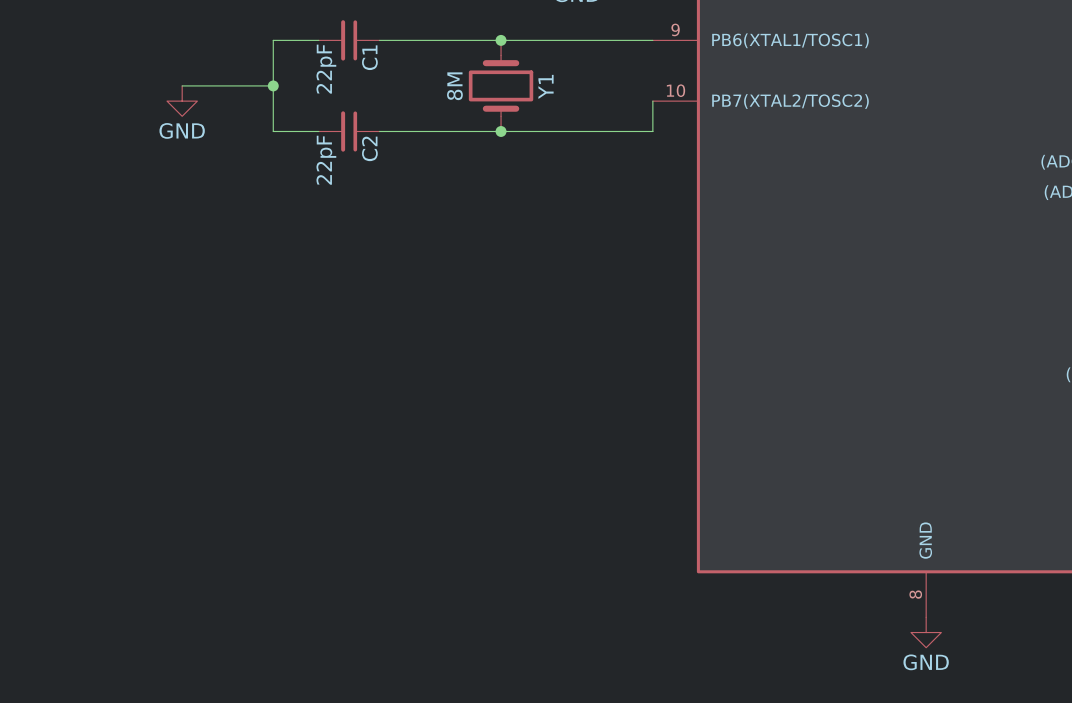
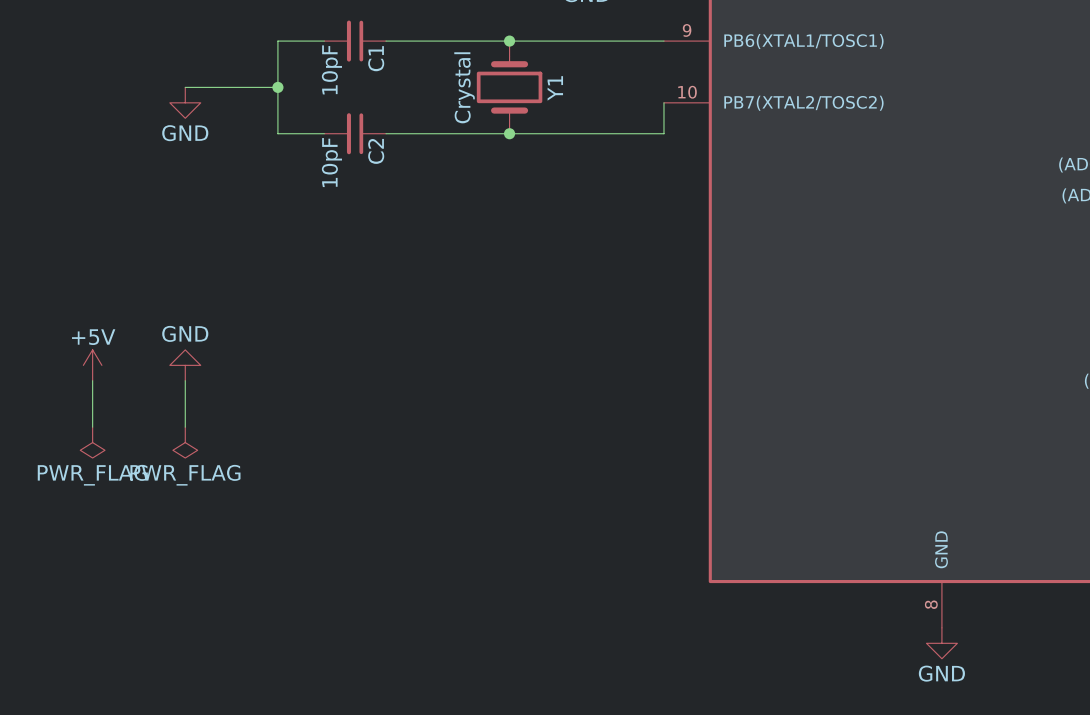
C1 value: 22pF (326, 69) -> 10pF (331, 69)
Y1 value: 8M (454, 86) -> Crystal (464, 87)
C2 value: 22pF (326, 160) -> 10pF (331, 162)
power symbol: none -> +5V (92, 365)
power symbol: none -> GND (185, 365)
wire: none -> (92, 380) (92, 427)
wire: none -> (185, 380) (185, 427)
power symbol: none -> PWR_FLAG (92, 442)
power symbol: none -> PWR_FLAG (185, 442)

